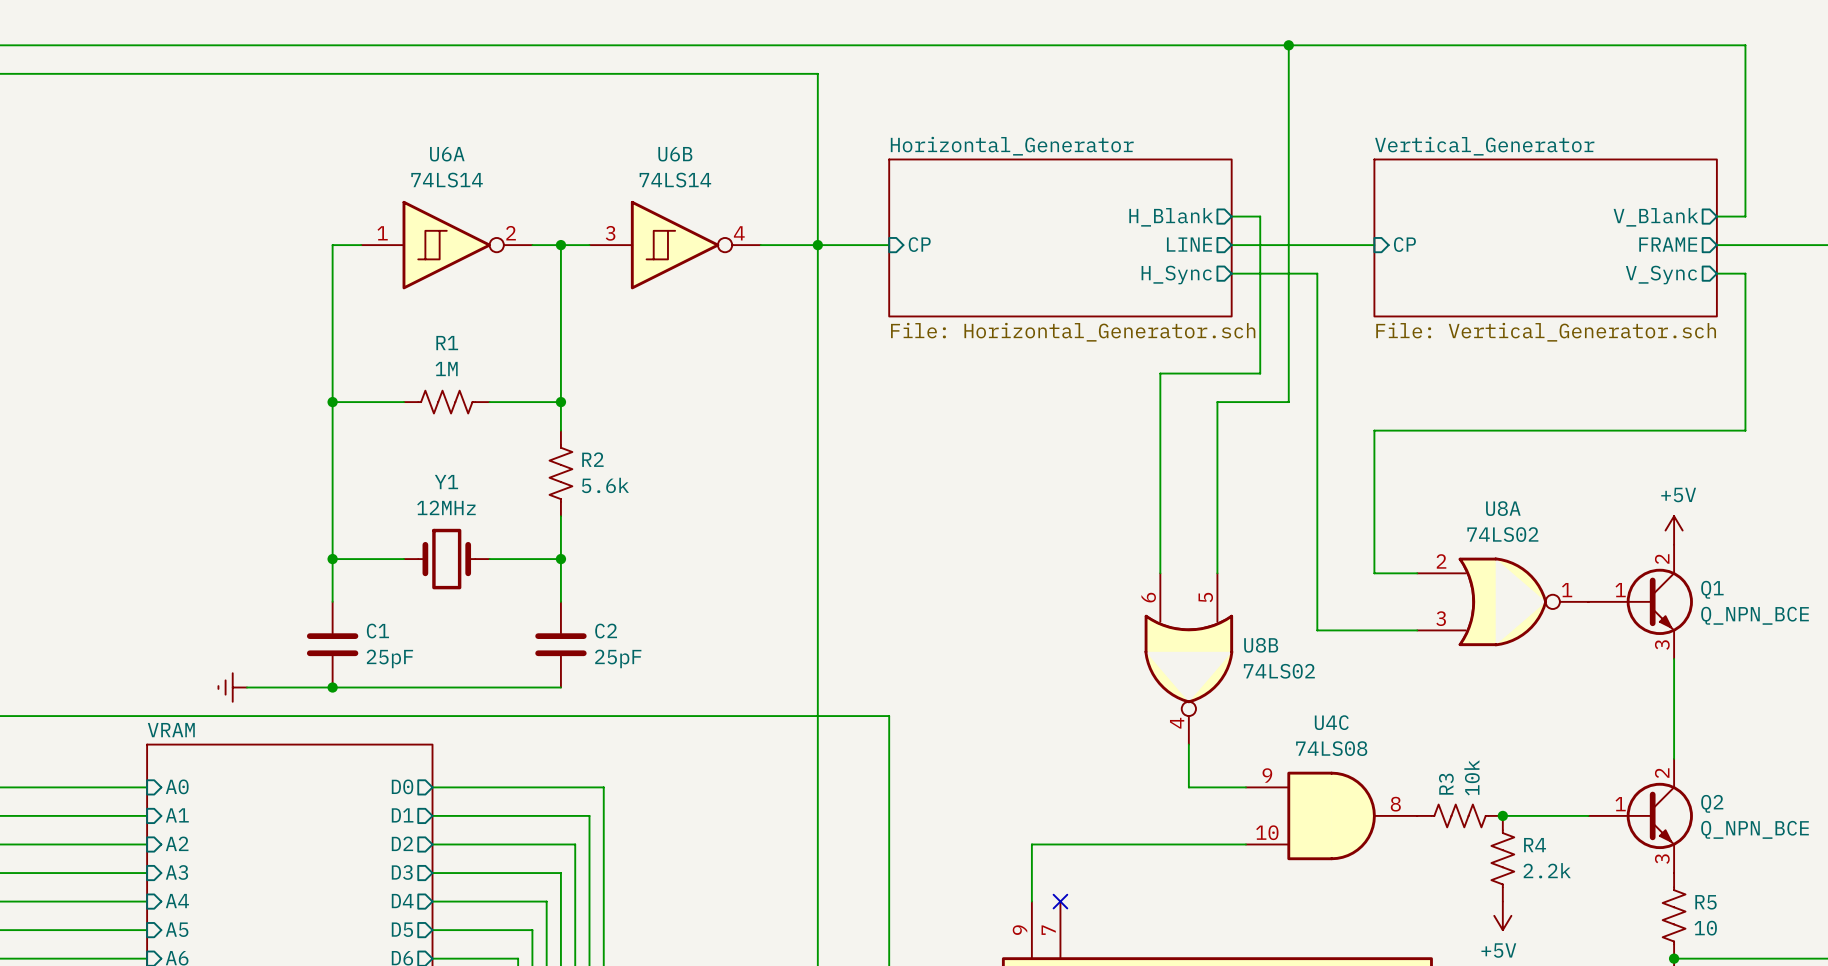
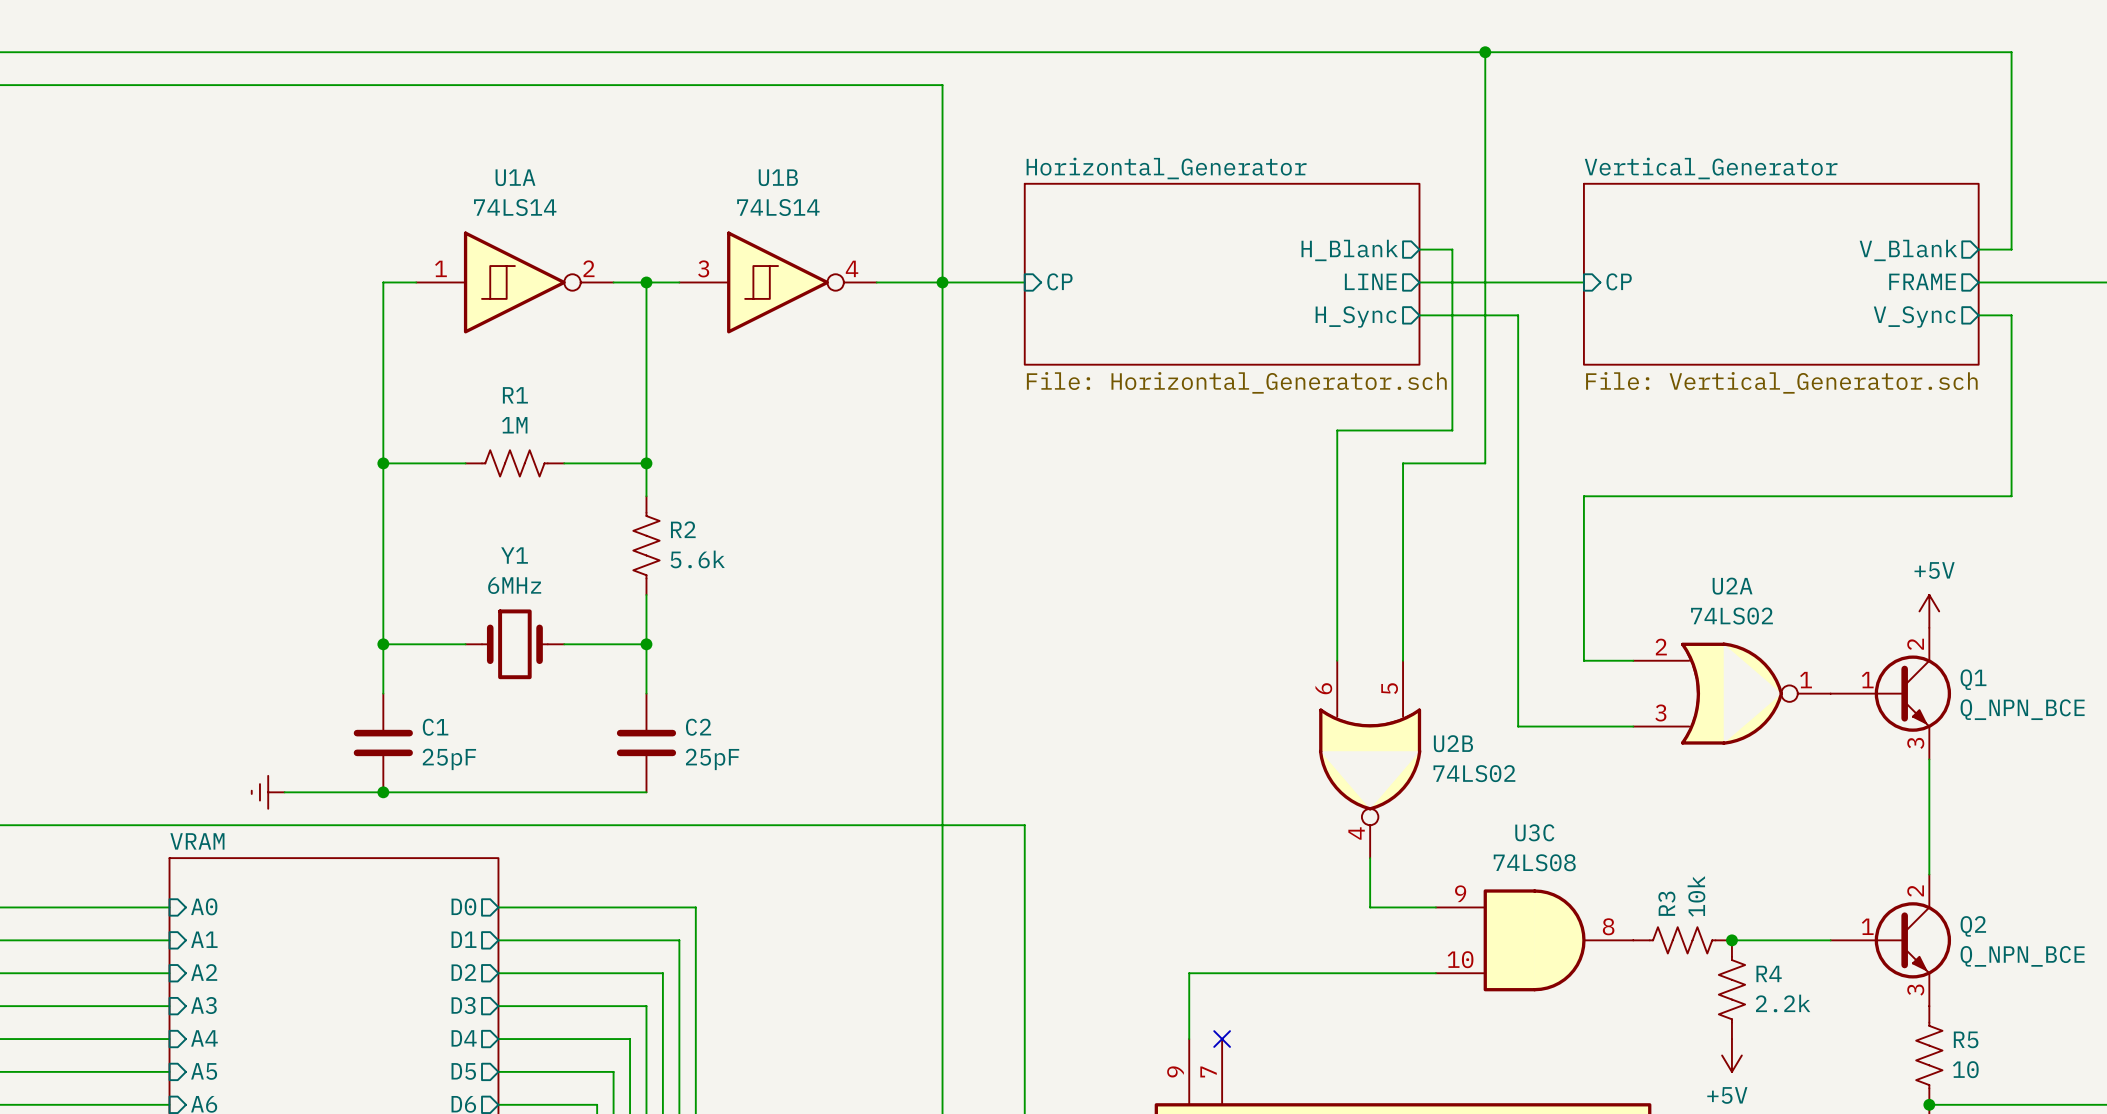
U6A name: U6A (447, 154) -> U1A (515, 177)
U6B name: U6B (675, 154) -> U1B (778, 177)
Y1 value: 12MHz (446, 507) -> 6MHz (514, 585)
U8A name: U8A (1503, 508) -> U2A (1732, 586)
U8B name: U8B (1261, 645) -> U2B (1453, 743)
U4C name: U4C (1331, 722) -> U3C (1534, 832)

